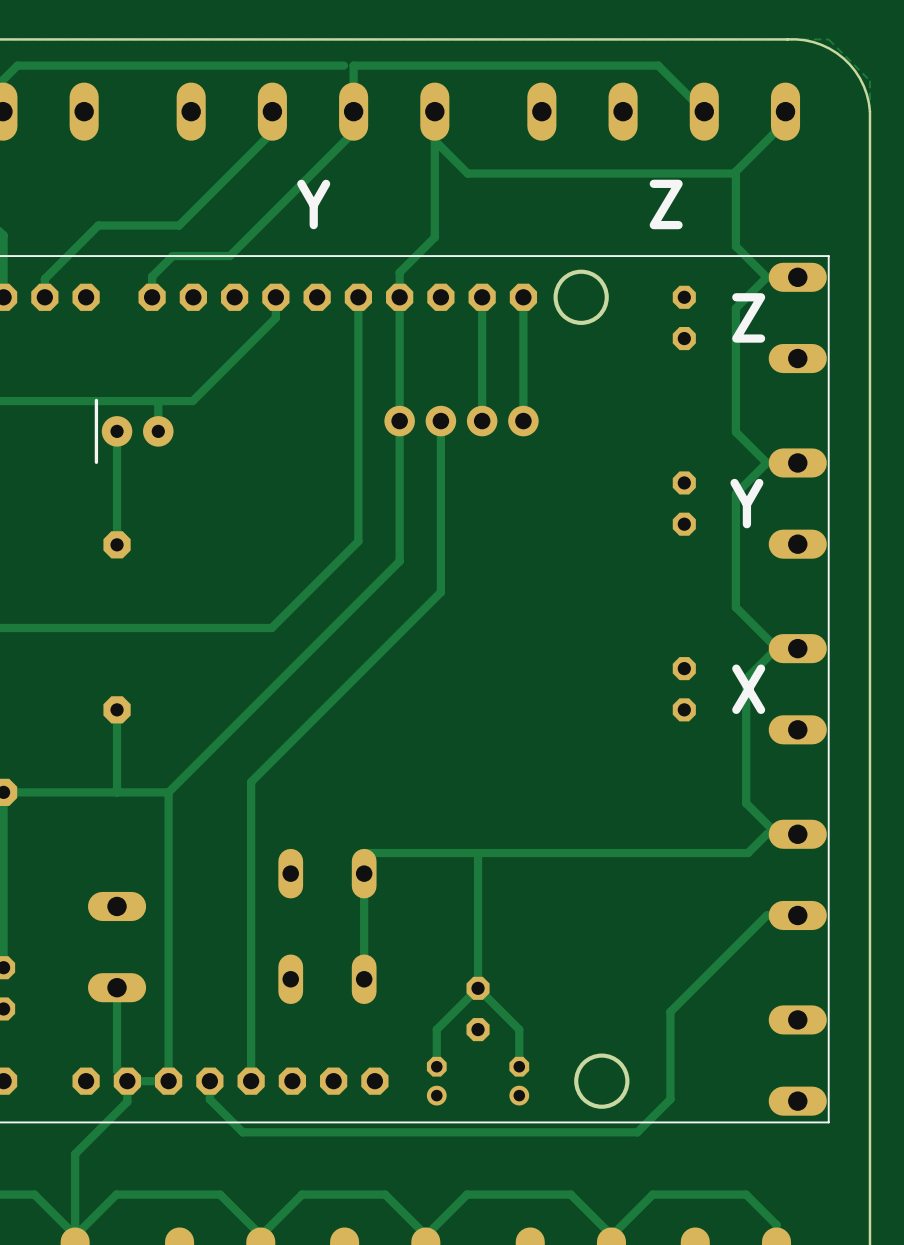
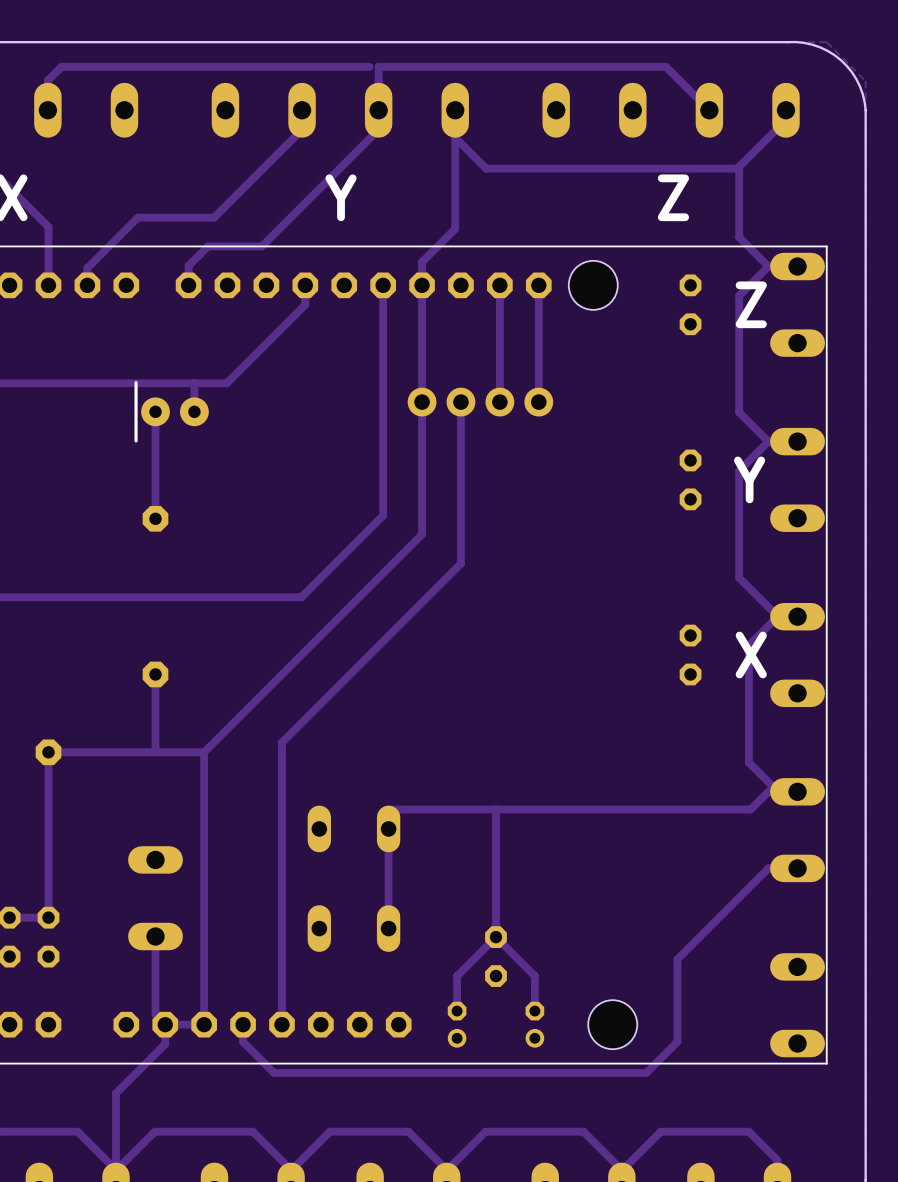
round board edge: [553, 269, 609, 325] -> none
hole: none -> (593, 285)
round board edge: [574, 1053, 630, 1109] -> none
hole: none -> (612, 1024)

